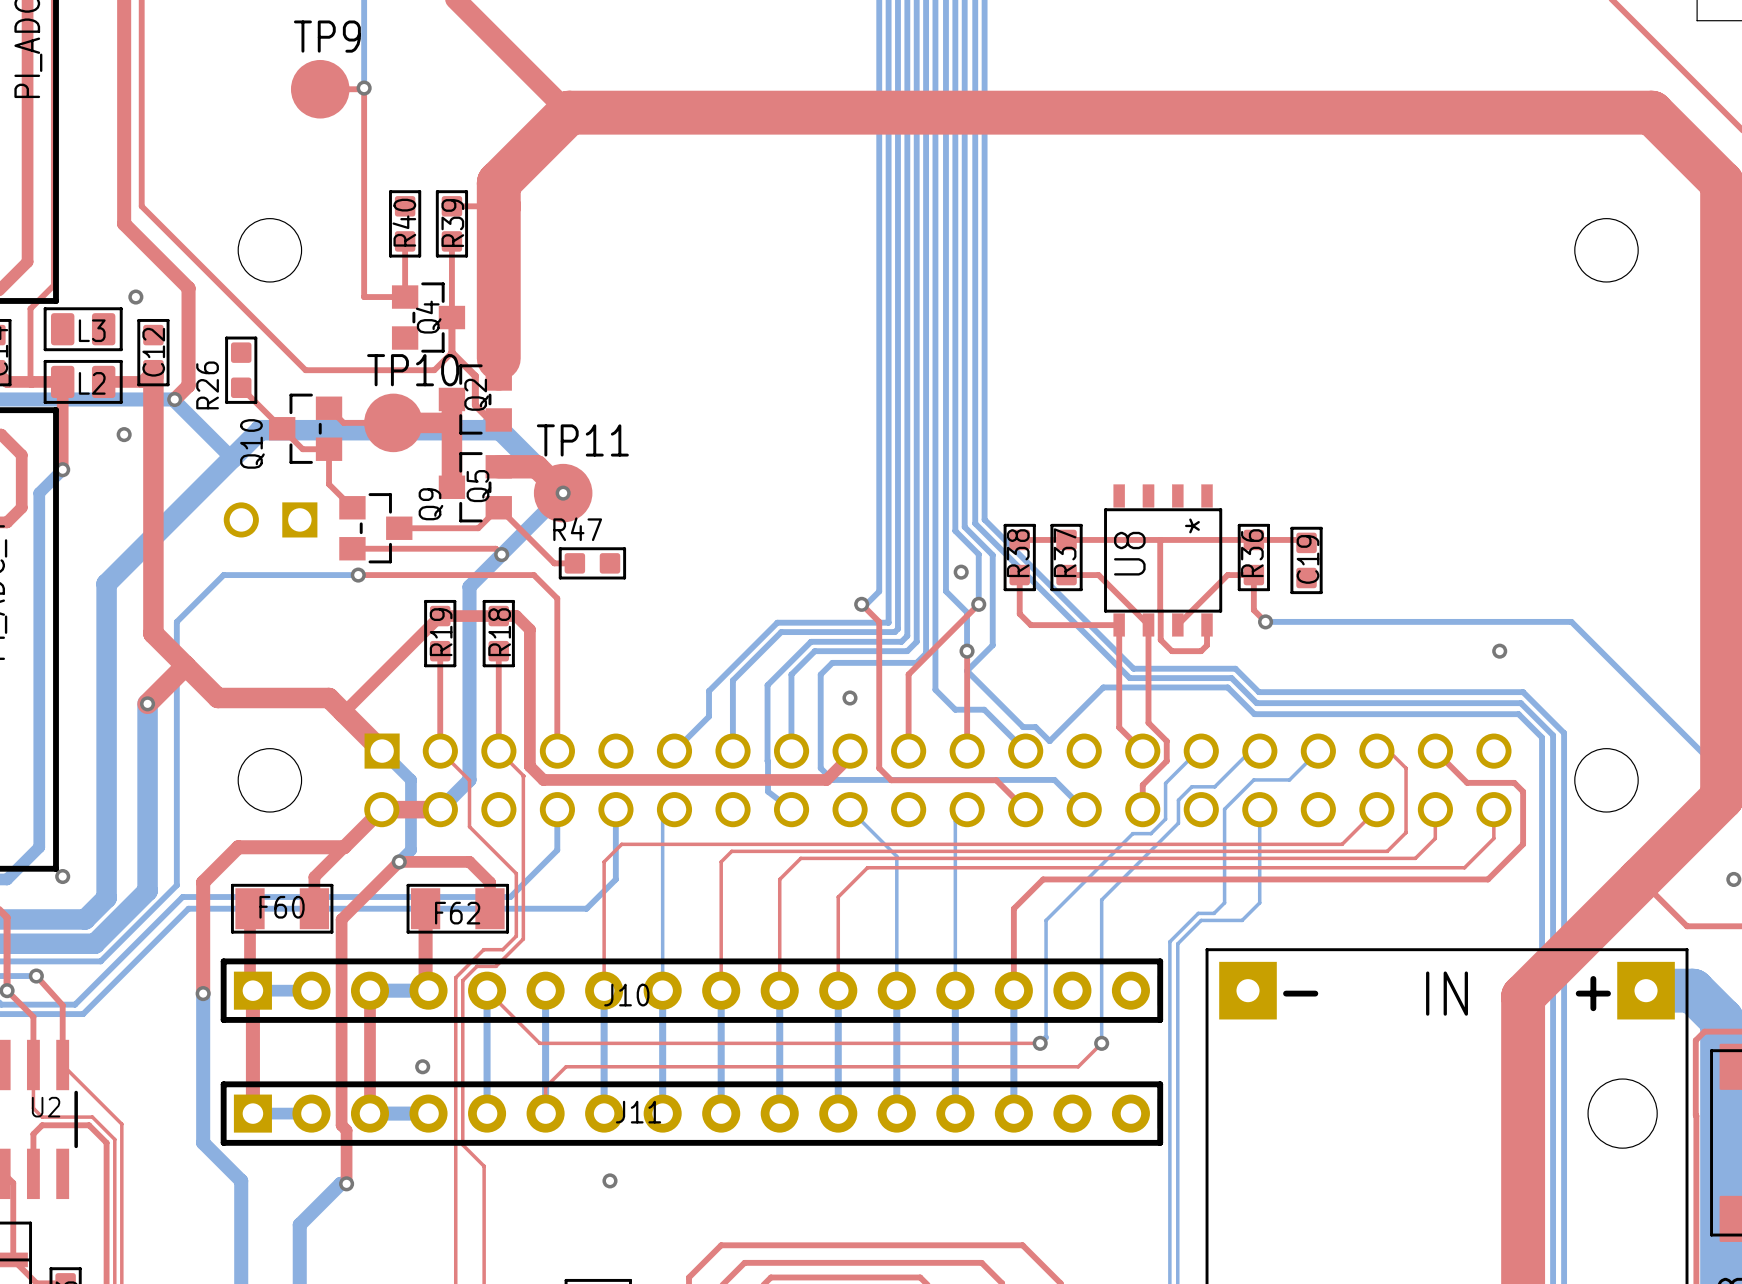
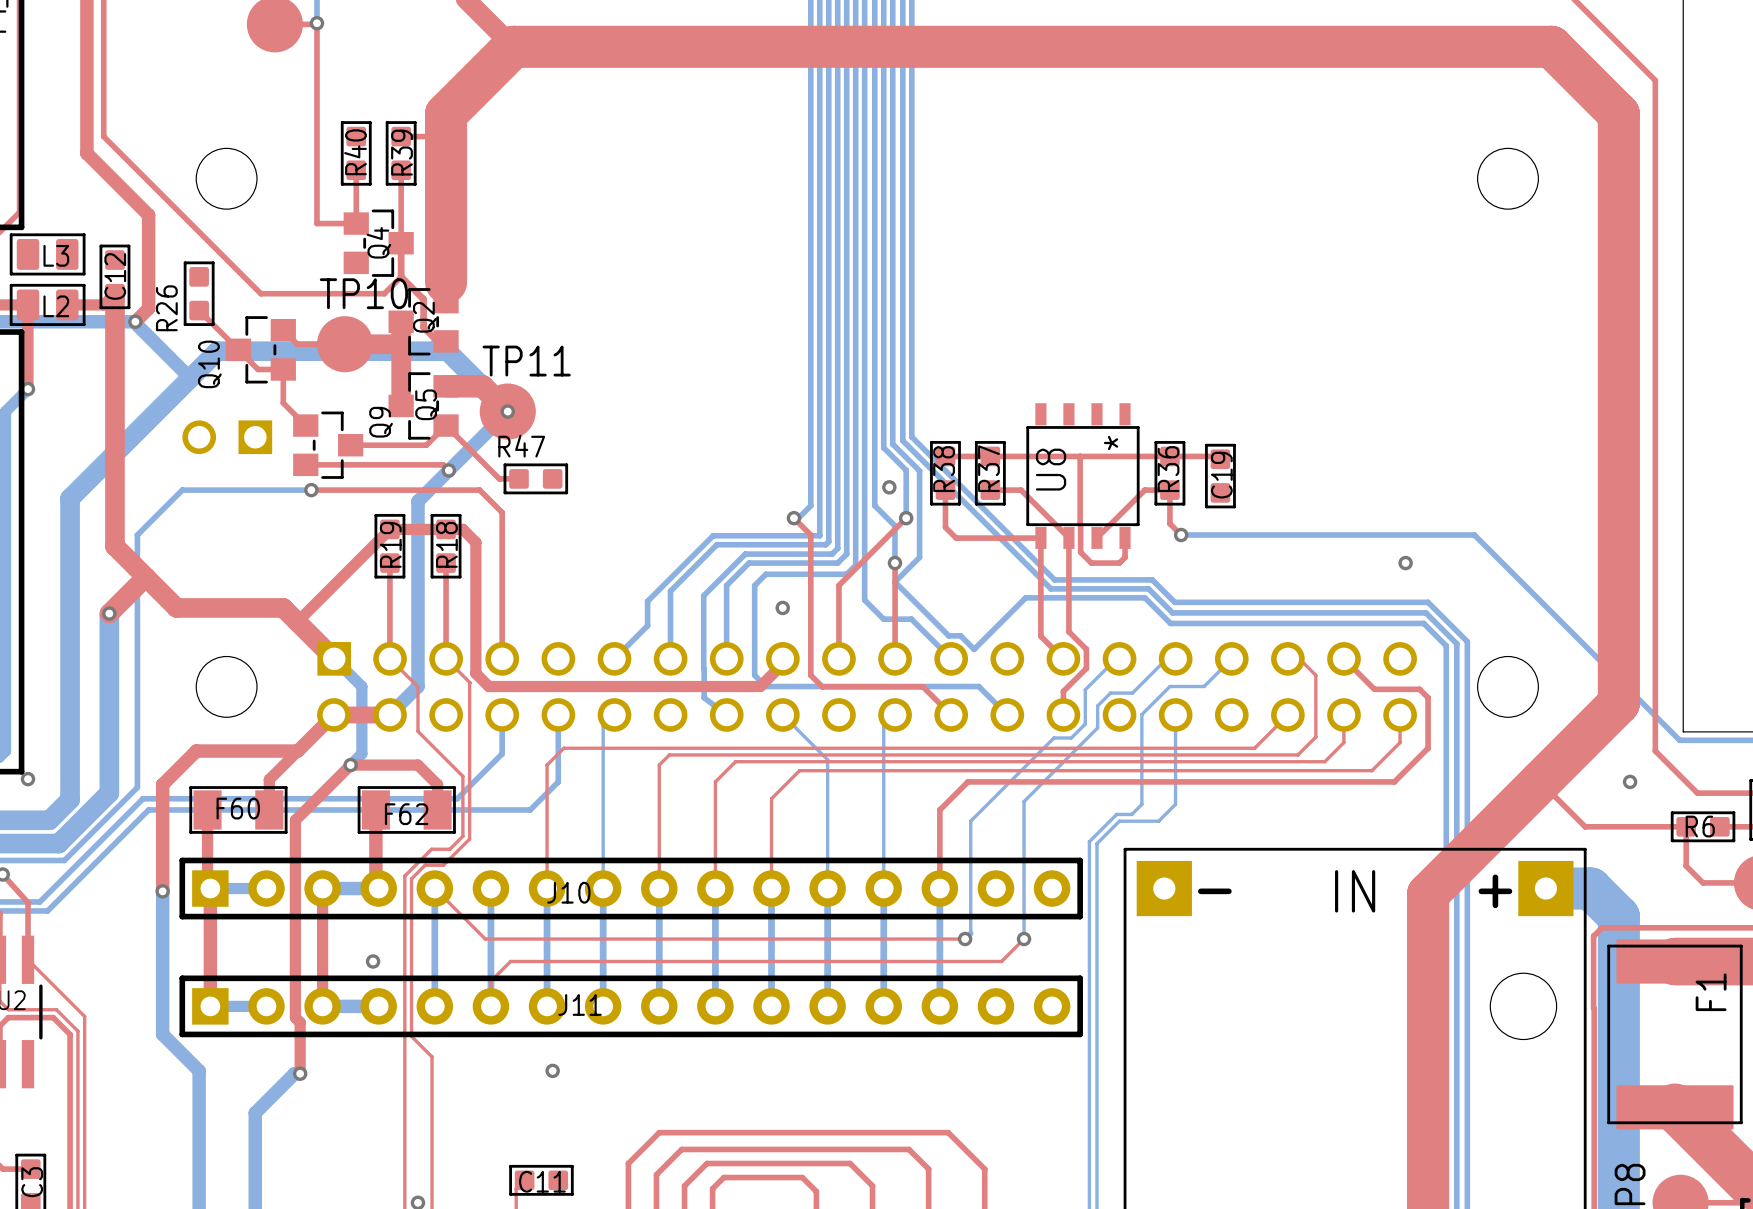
via: (135, 297) -> none
via: (124, 434) -> none

